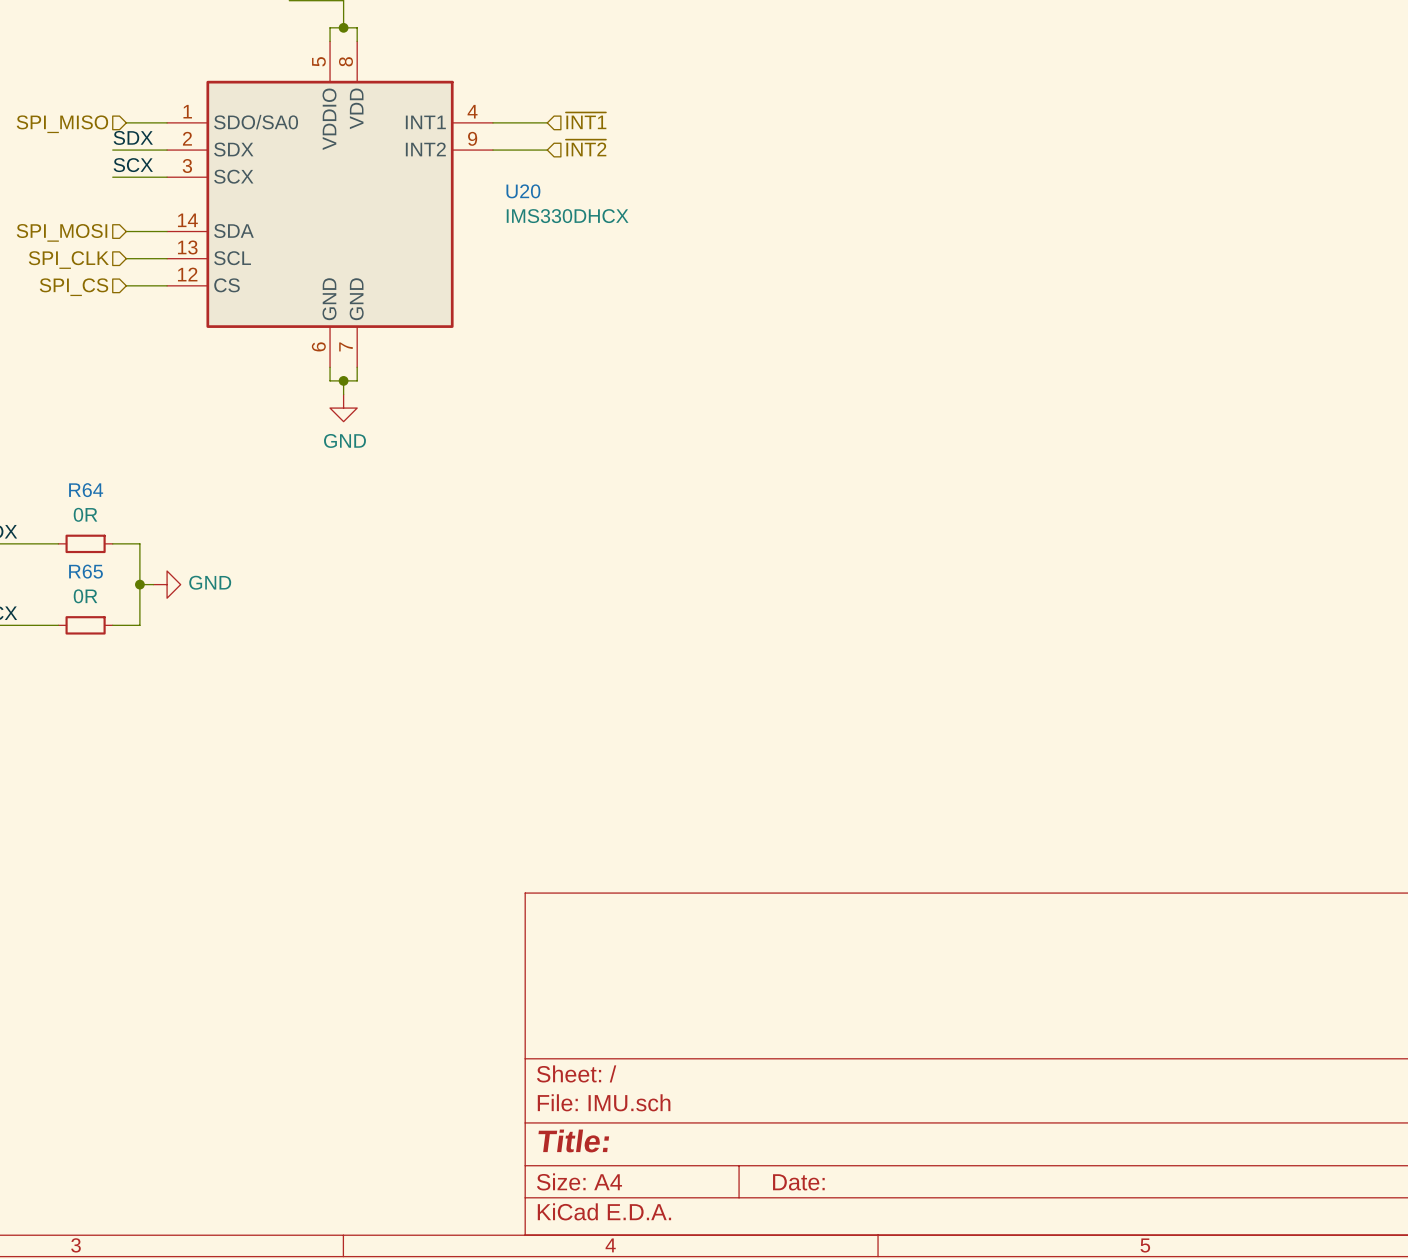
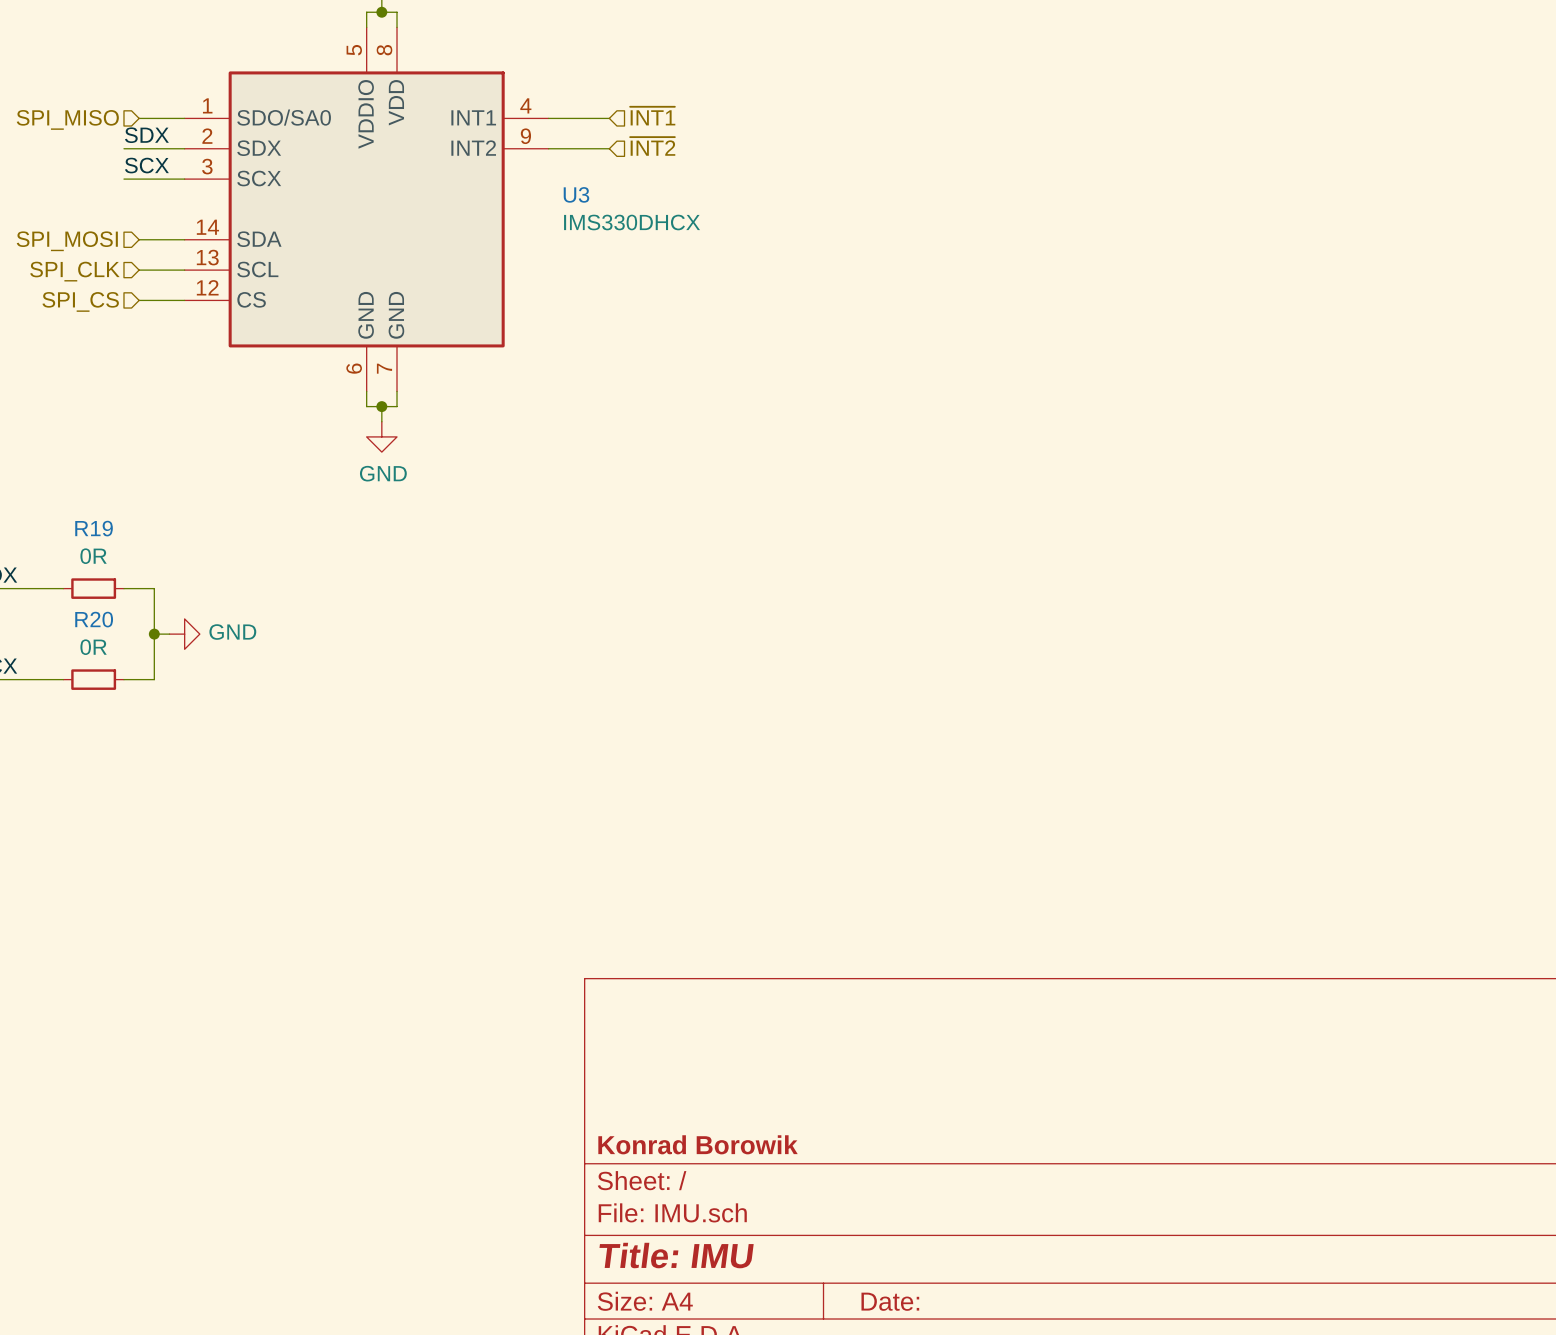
U20 name: U20 (523, 191) -> U3 (576, 194)
R64 name: R64 (86, 490) -> R19 (94, 528)
R65 name: R65 (85, 571) -> R20 (94, 619)
title block: none -> Konrad Borowik (698, 1144)
title block: Title: (573, 1140) -> Title: IMU (676, 1255)

